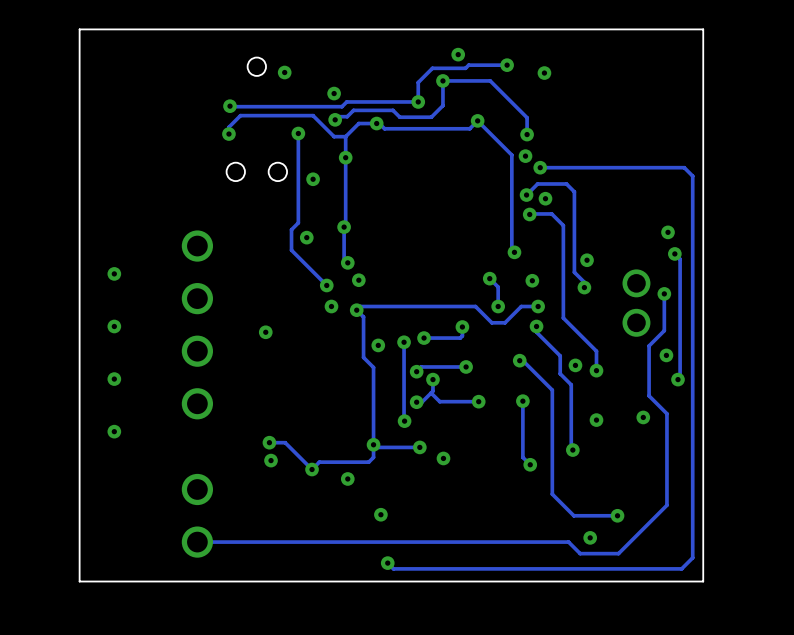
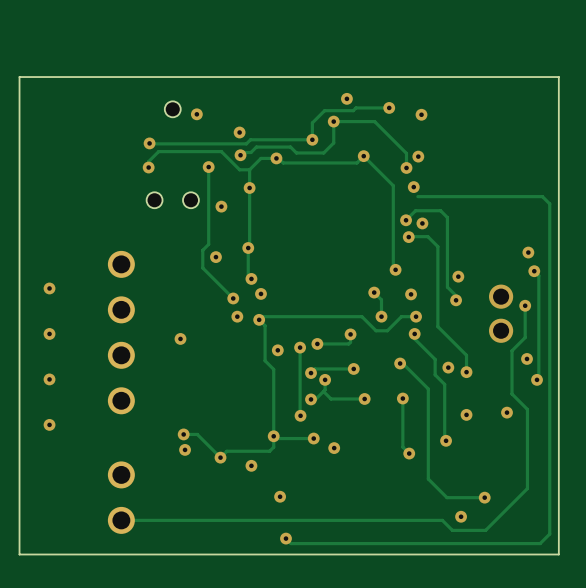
via: none -> (418, 156)
via: (525, 156) -> none
via: none -> (413, 187)
via: (540, 167) -> none

